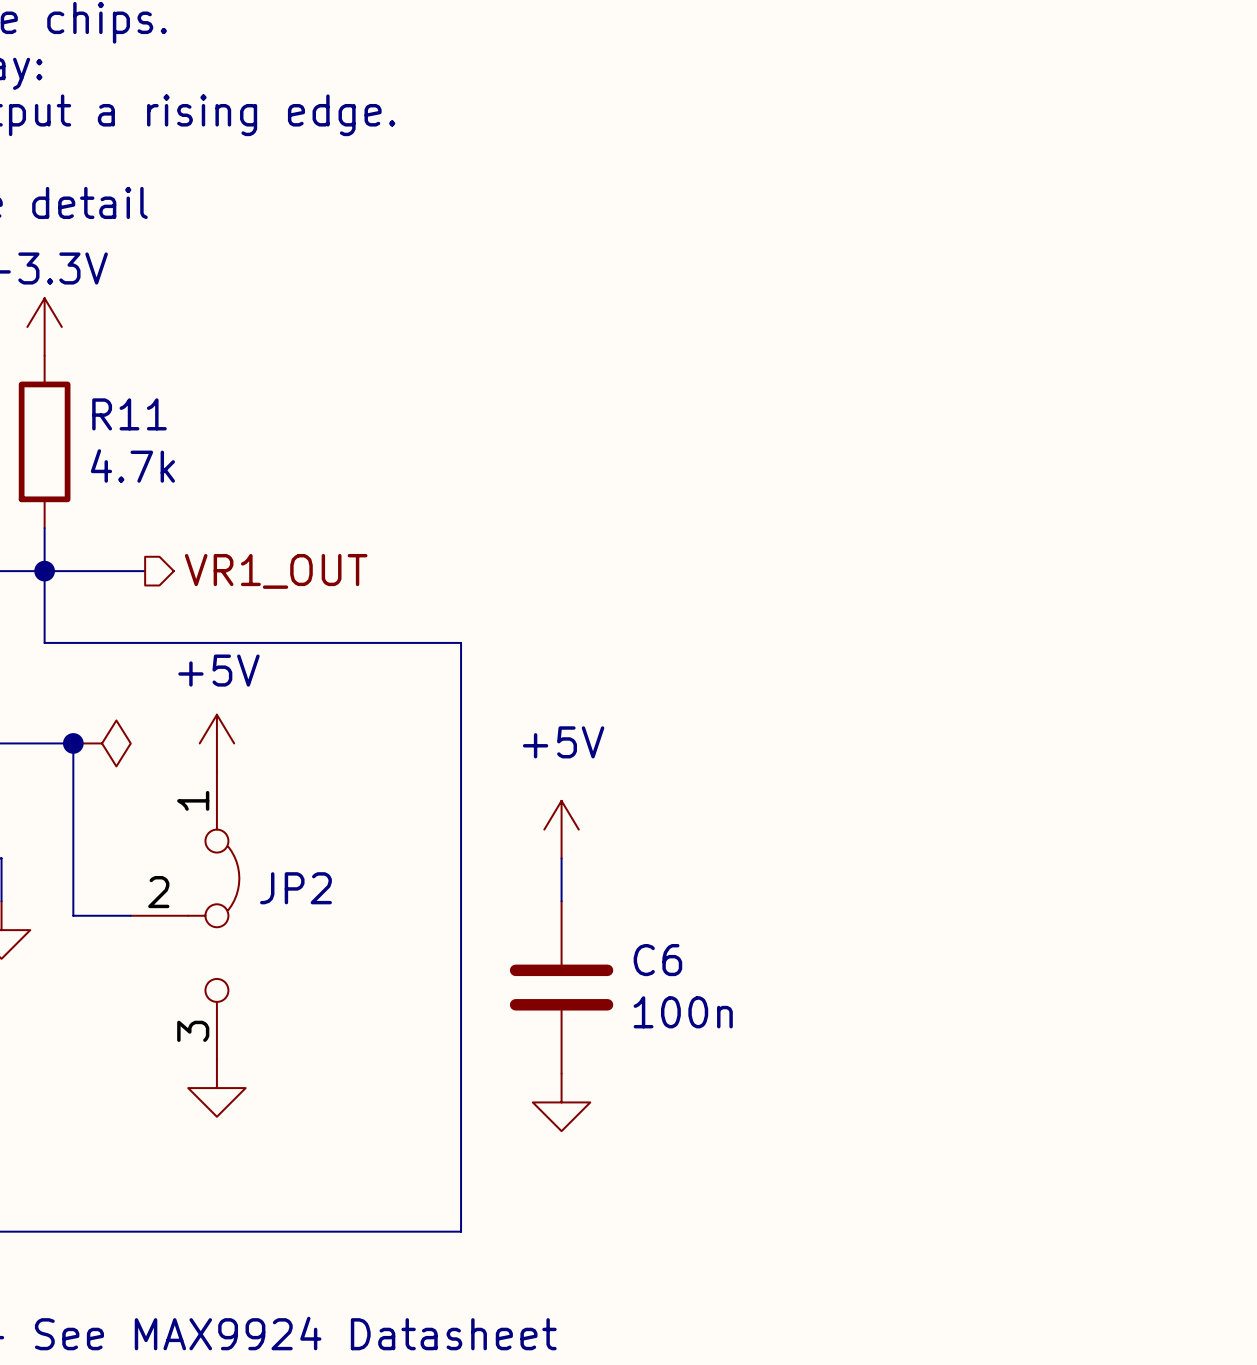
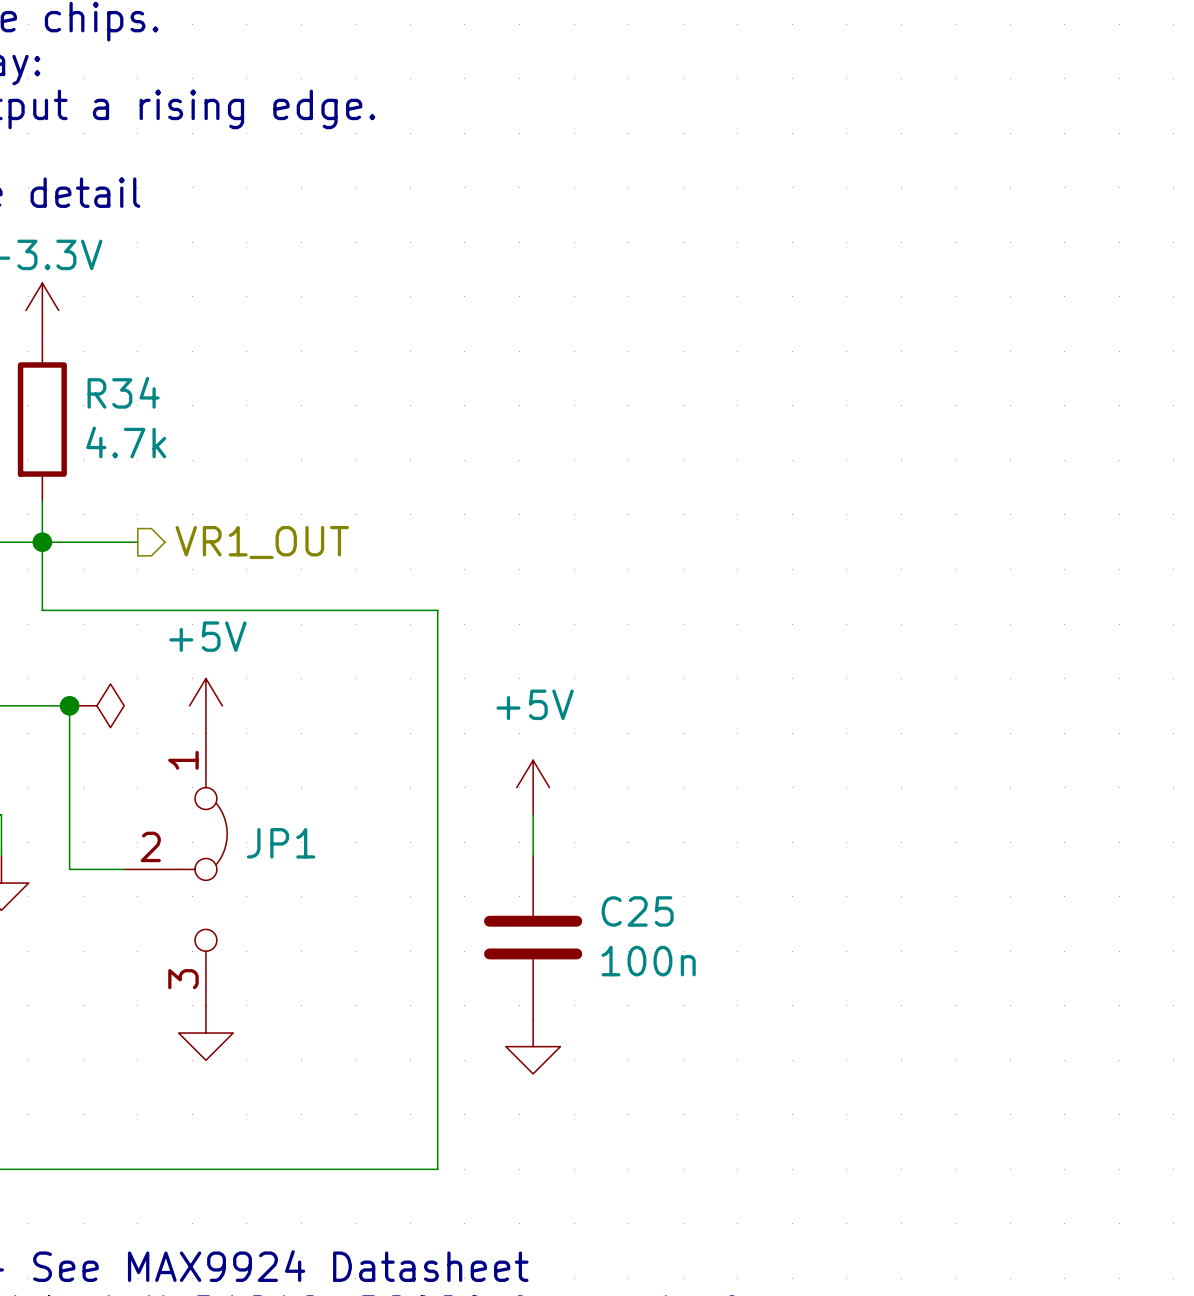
R11 name: R11 (129, 414) -> R34 (123, 392)
JP2 name: JP2 (295, 888) -> JP1 (281, 843)
C6 name: C6 (657, 960) -> C25 (637, 911)

